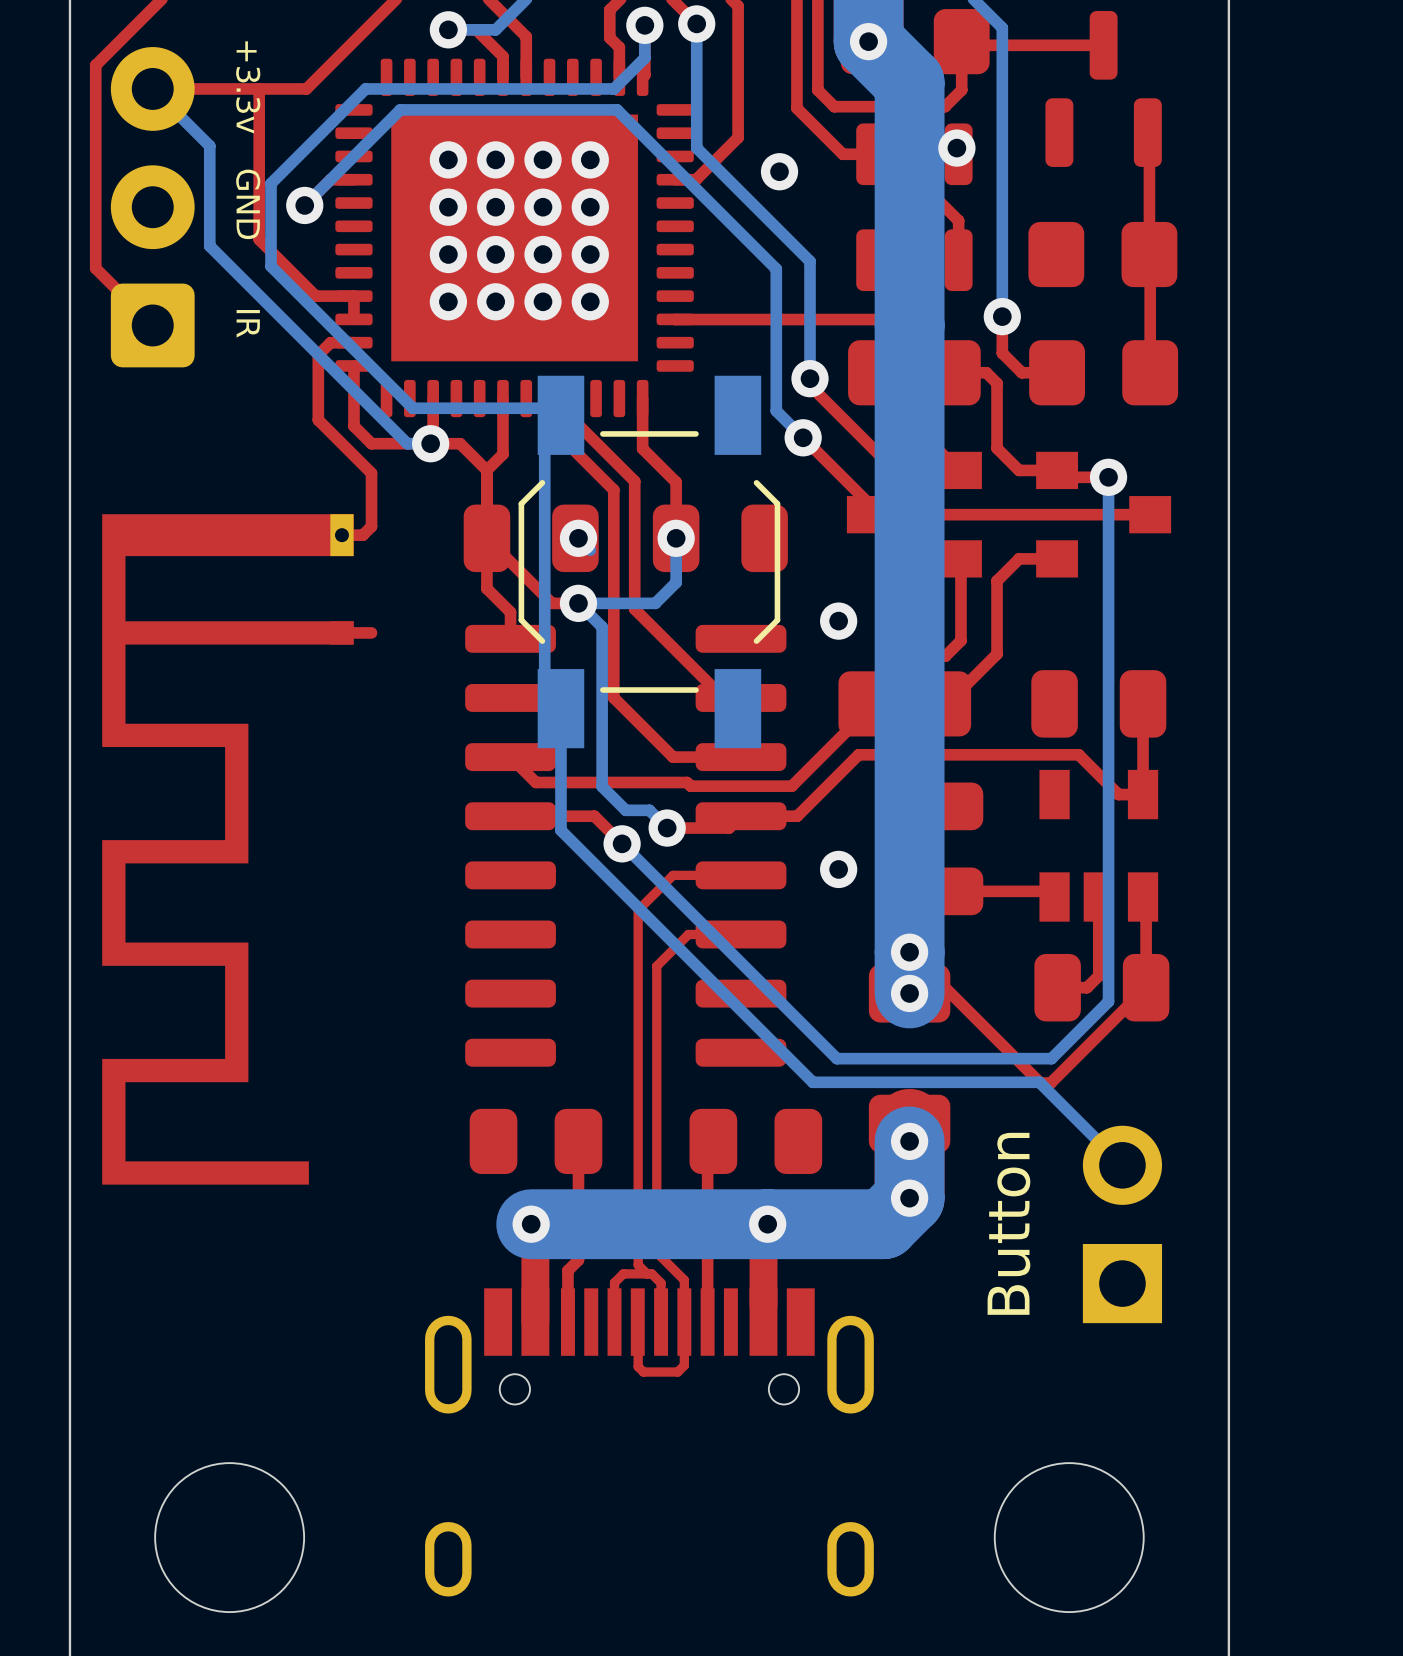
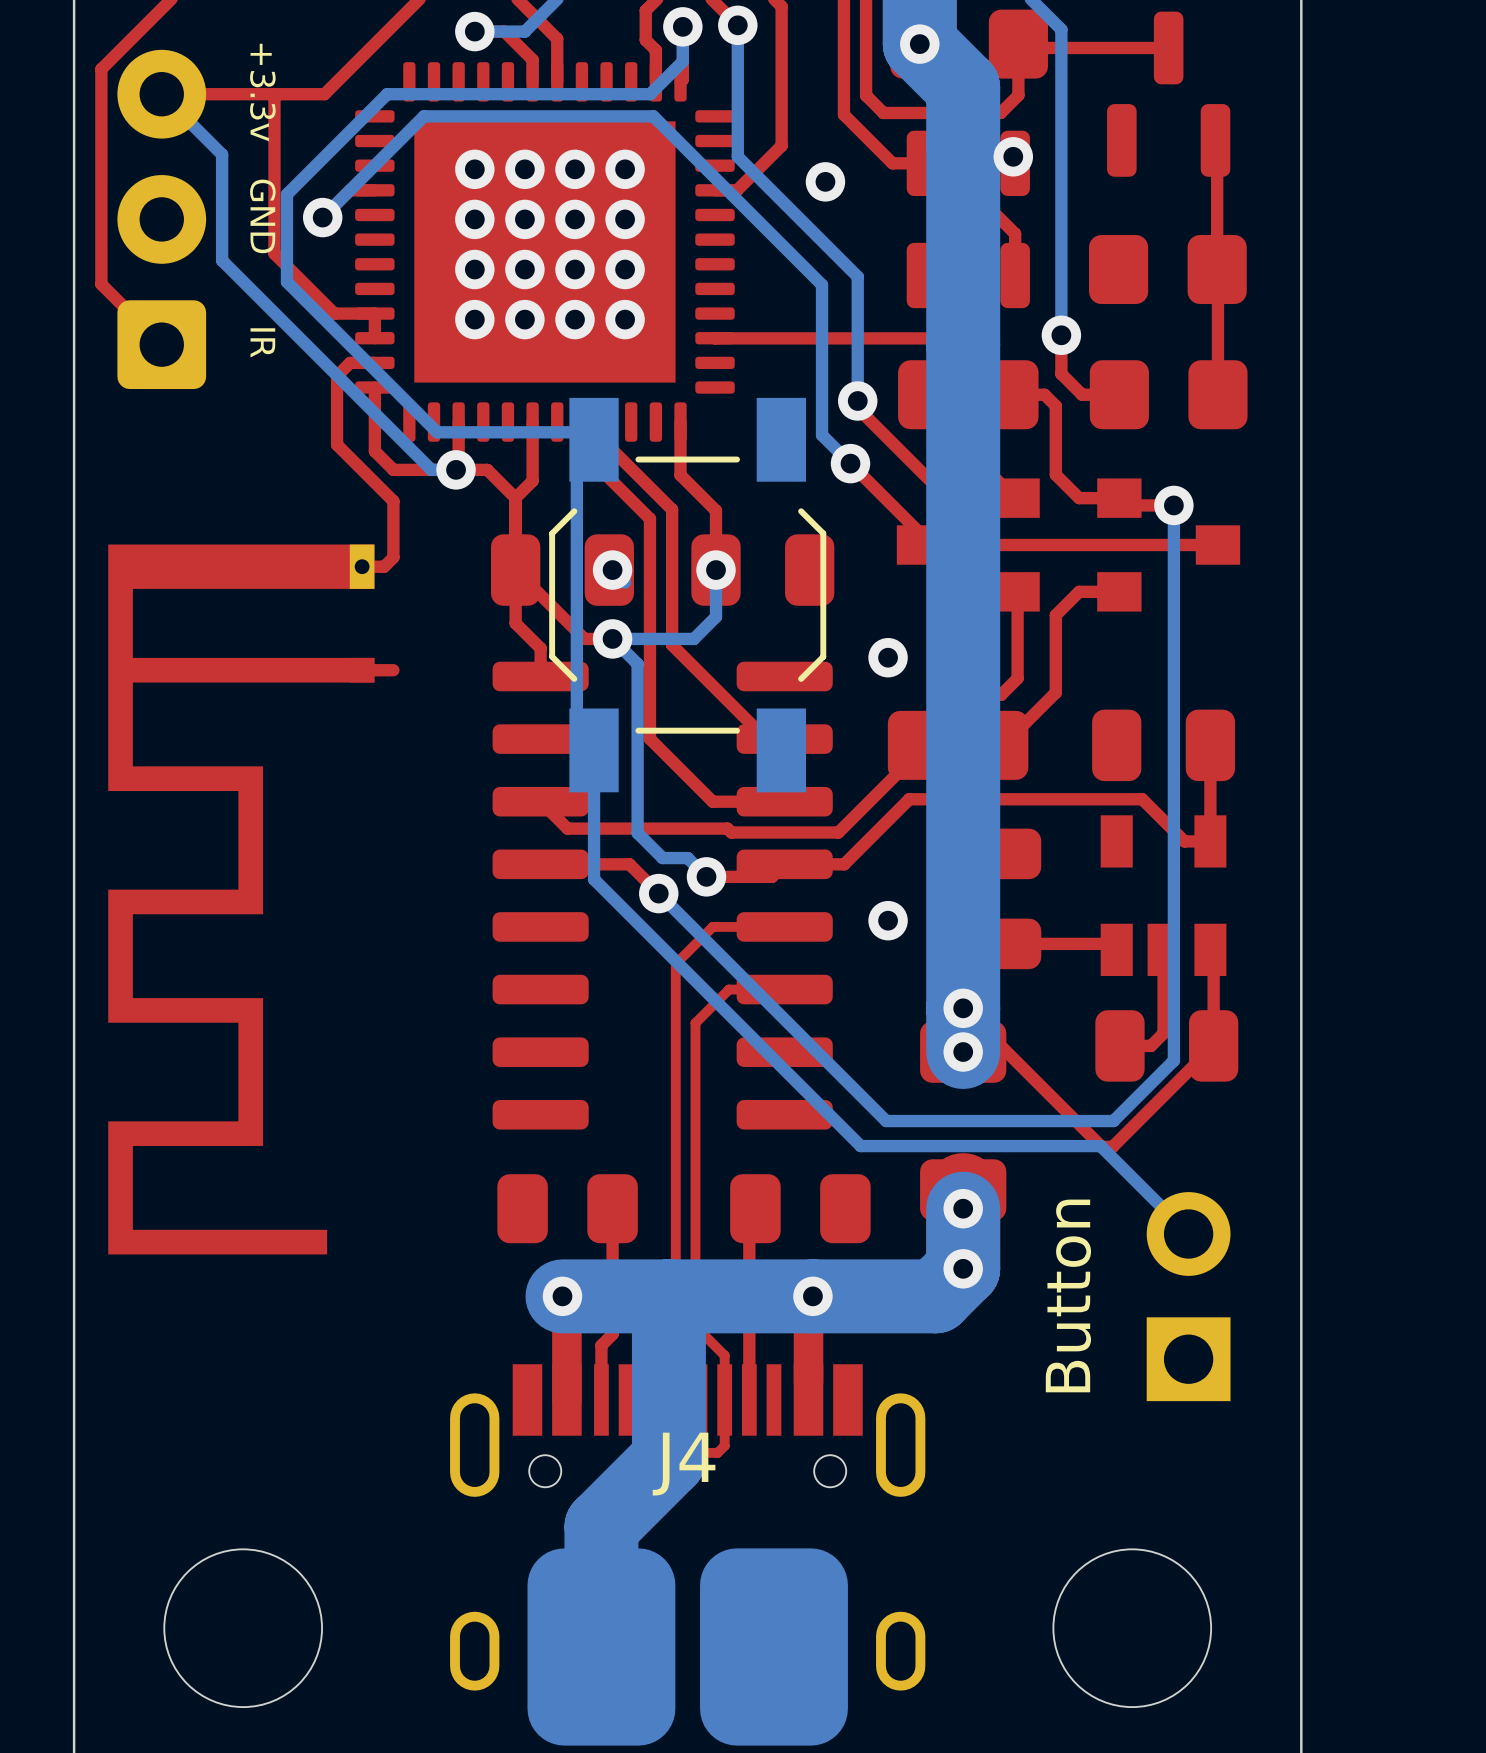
bottom track: none -> (668, 1296) (668, 1459) (601, 1526) (601, 1646)
J4: none -> (687, 1646)

